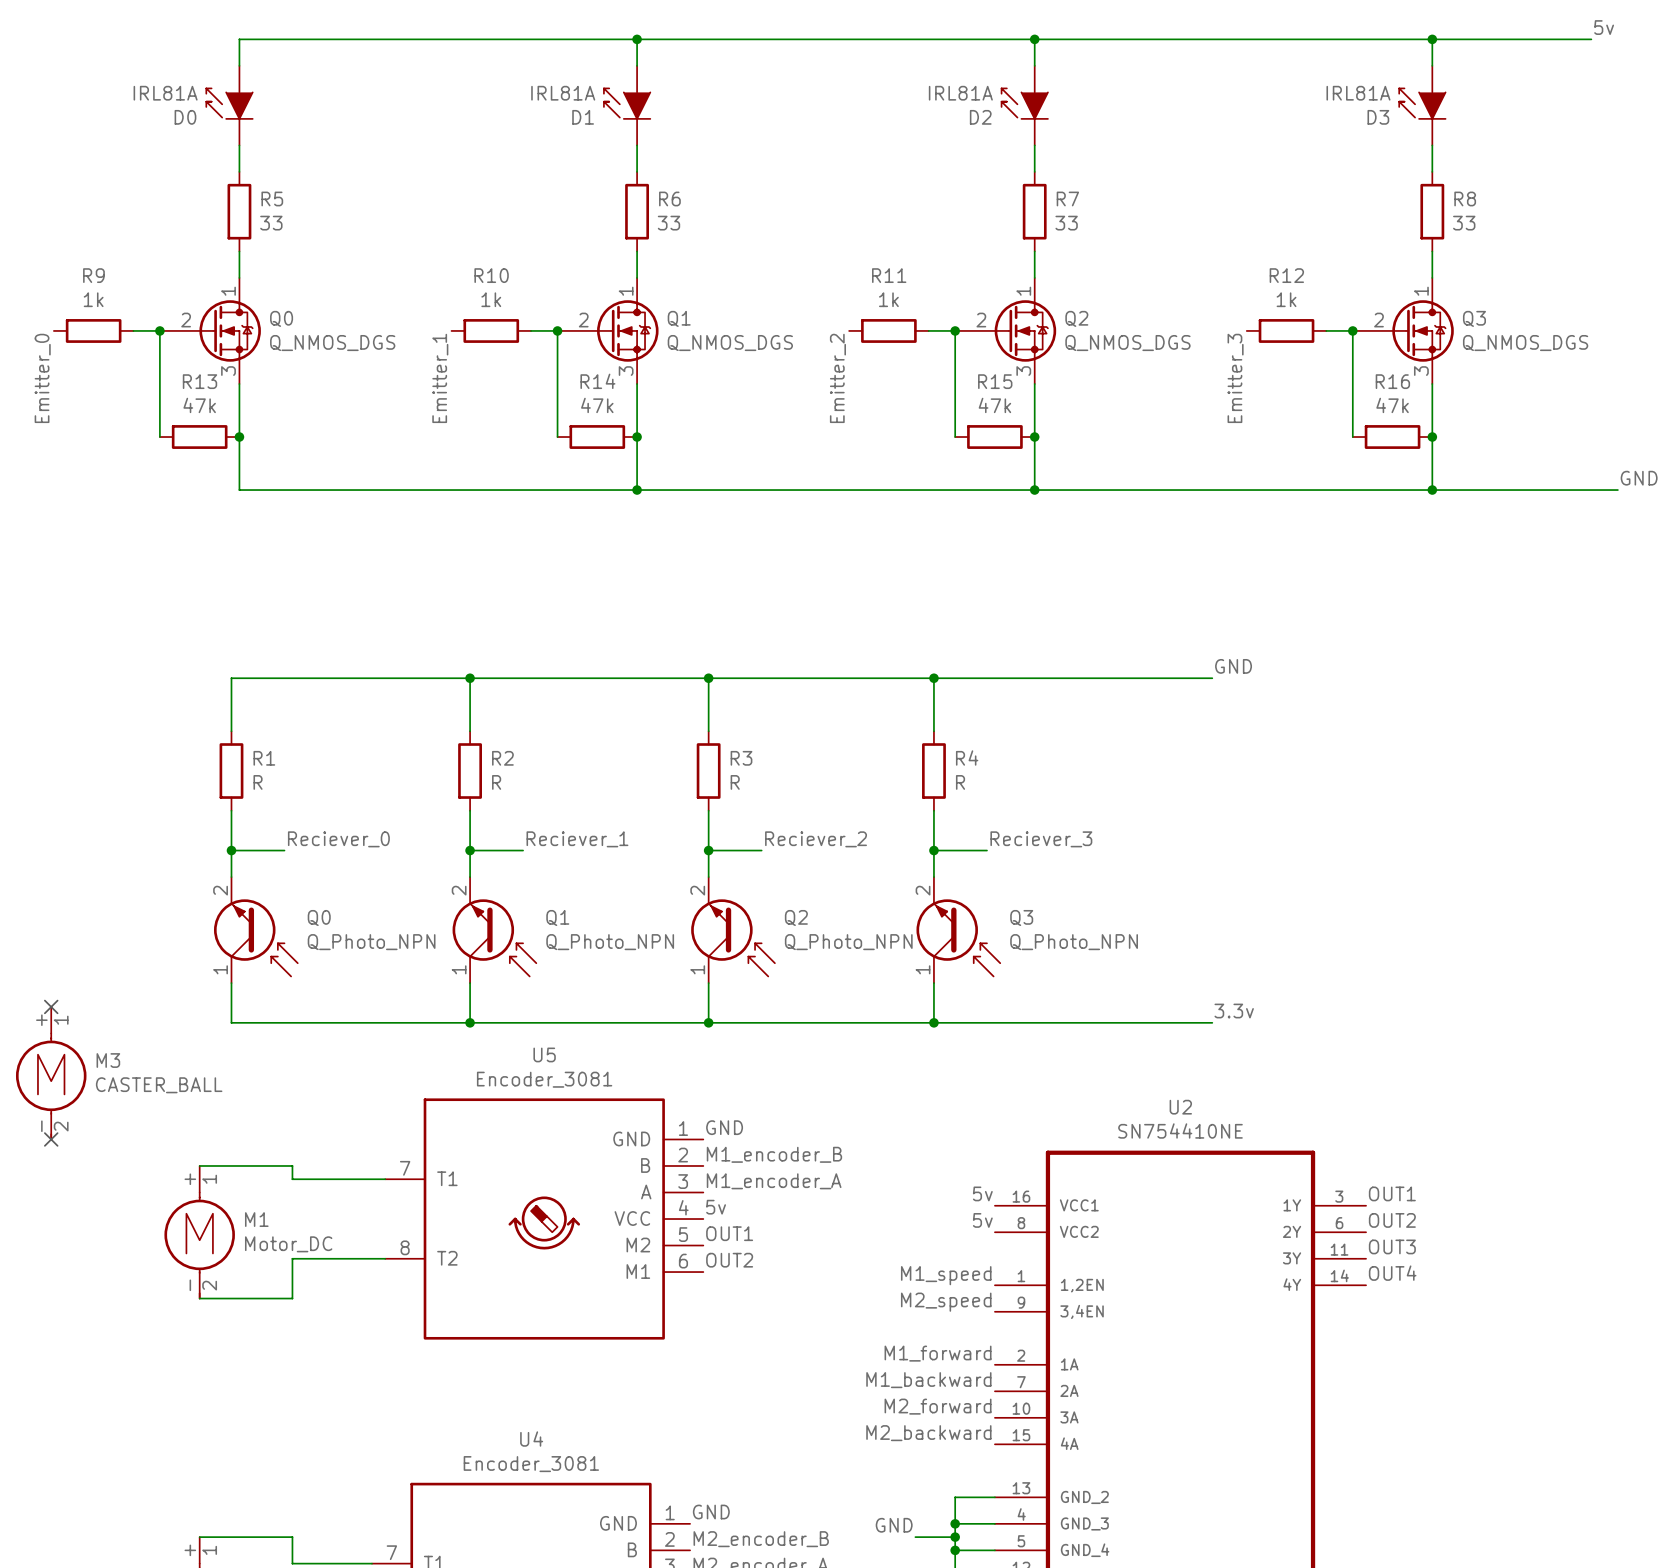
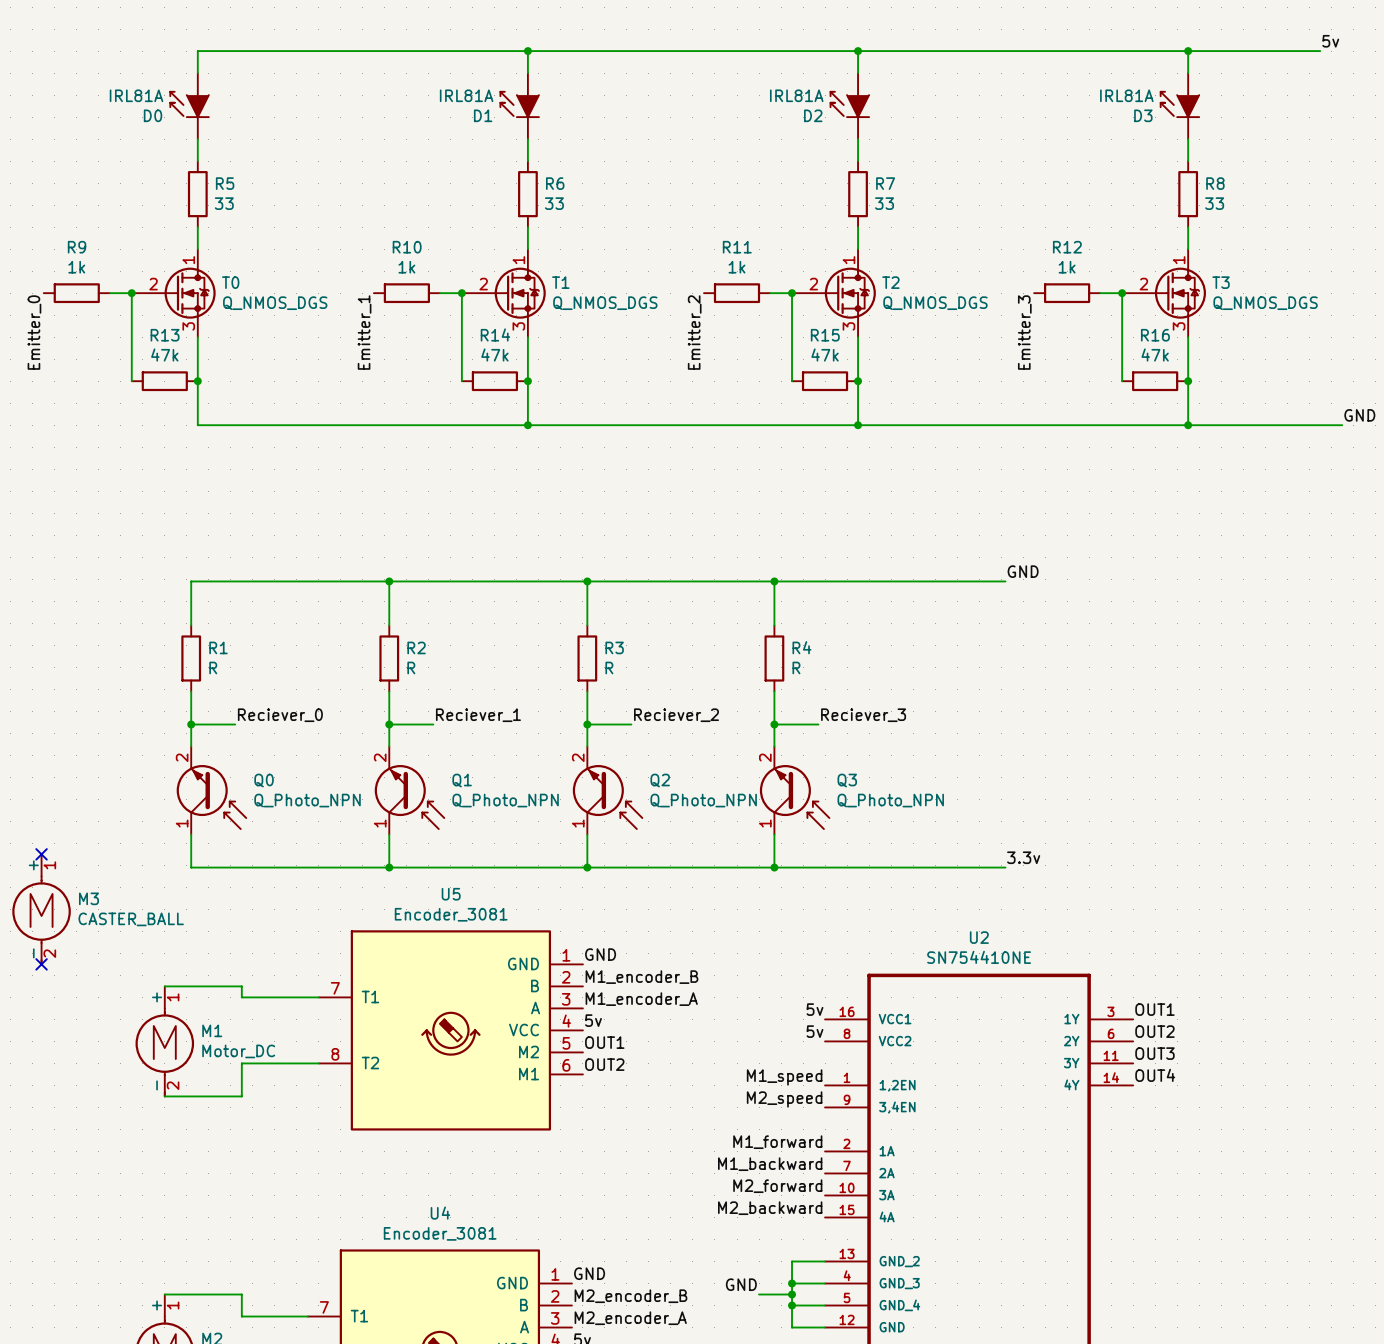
Q0 name: Q0 (281, 318) -> T0 (230, 282)
Q1 name: Q1 (679, 318) -> T1 (560, 282)
Q2 name: Q2 (1076, 318) -> T2 (890, 282)
Q3 name: Q3 (1474, 318) -> T3 (1221, 282)

